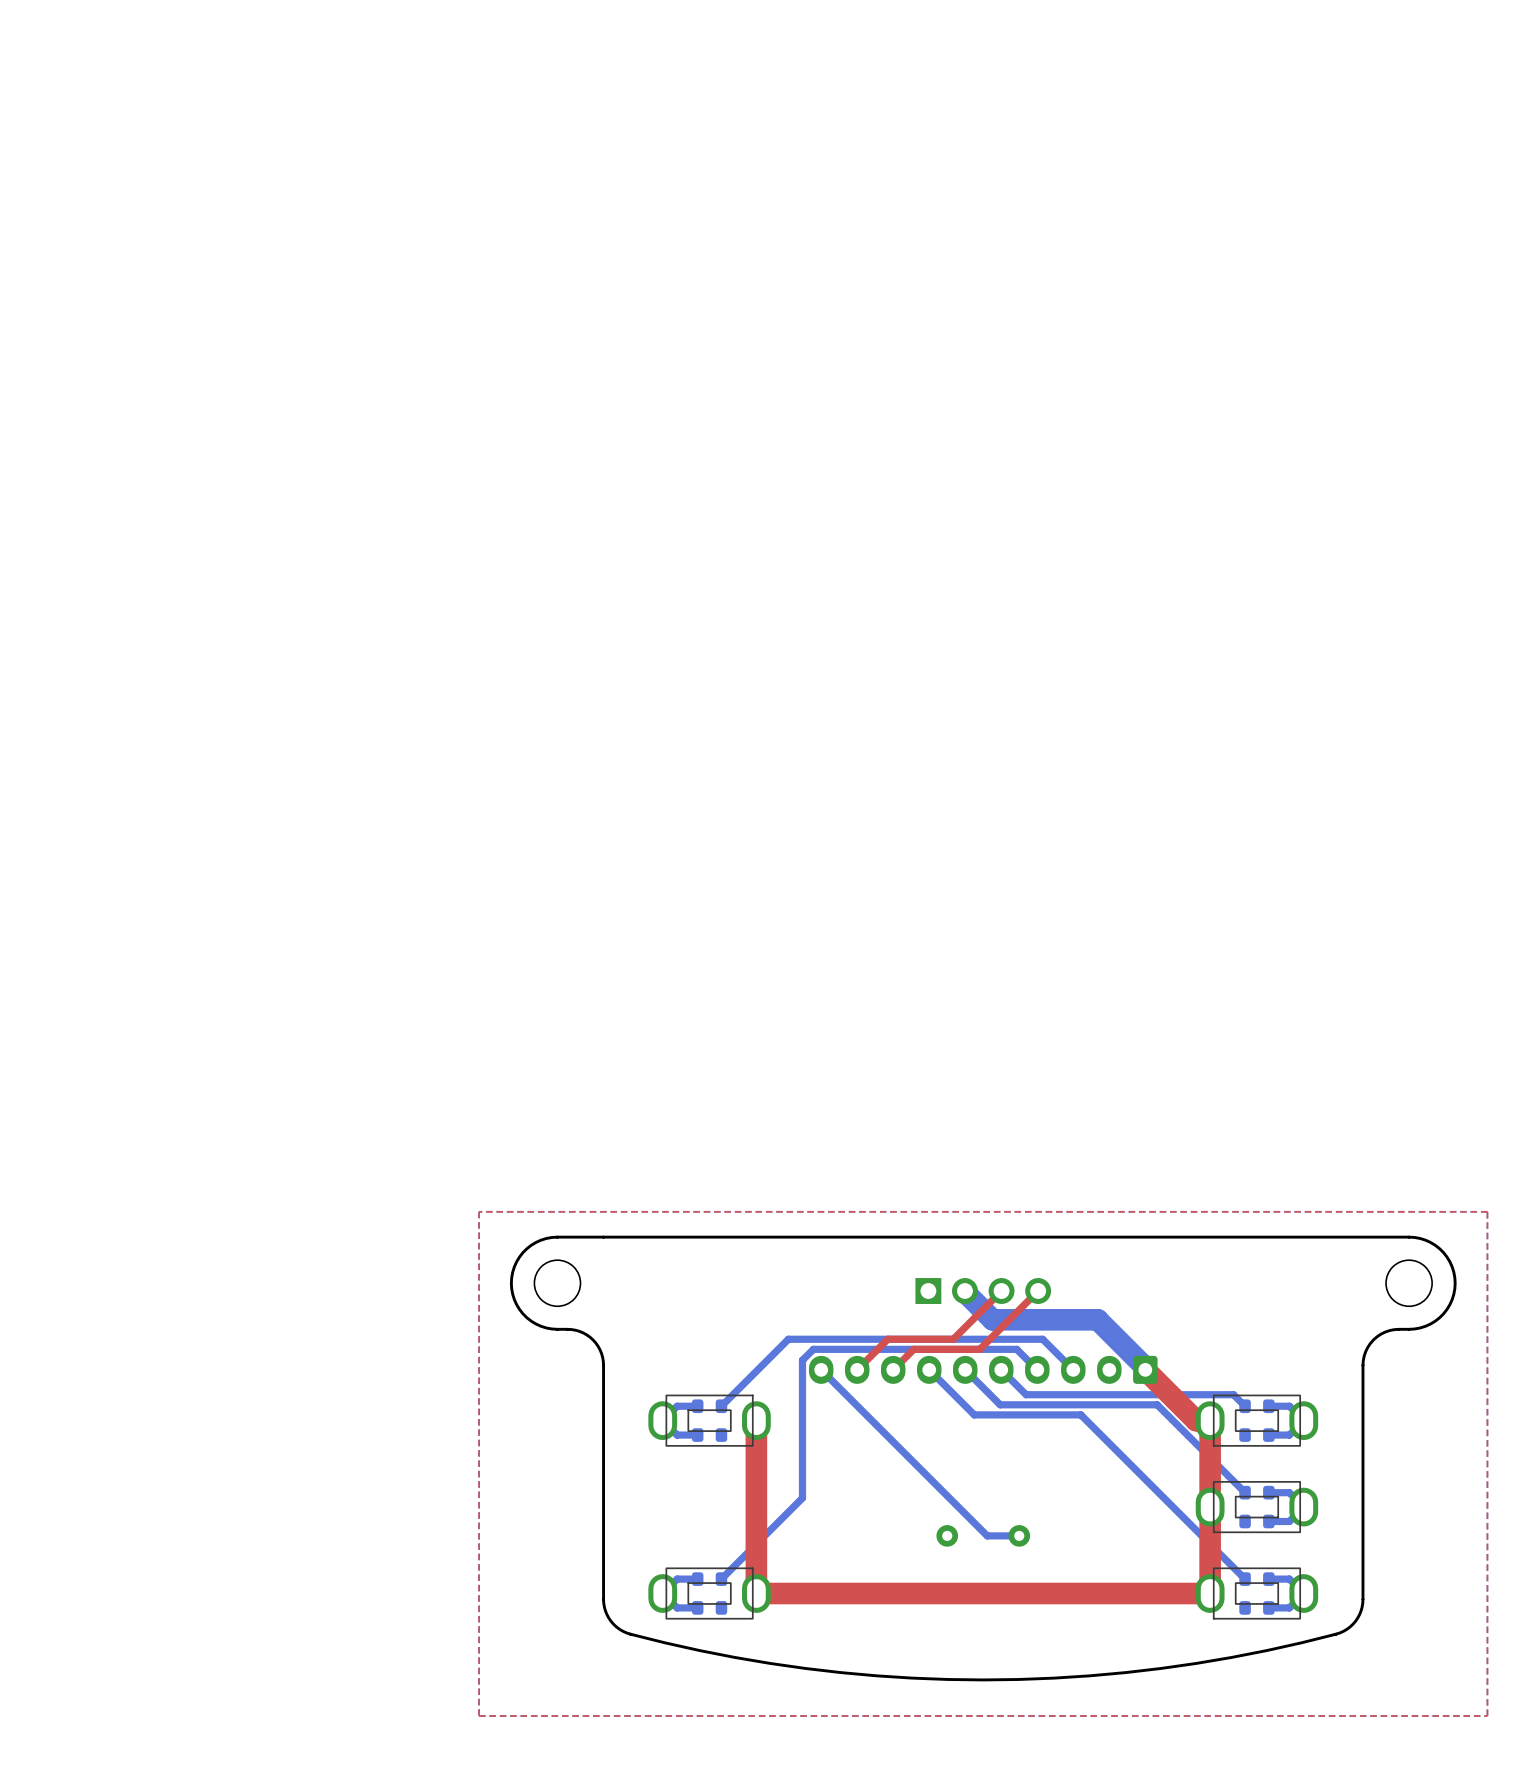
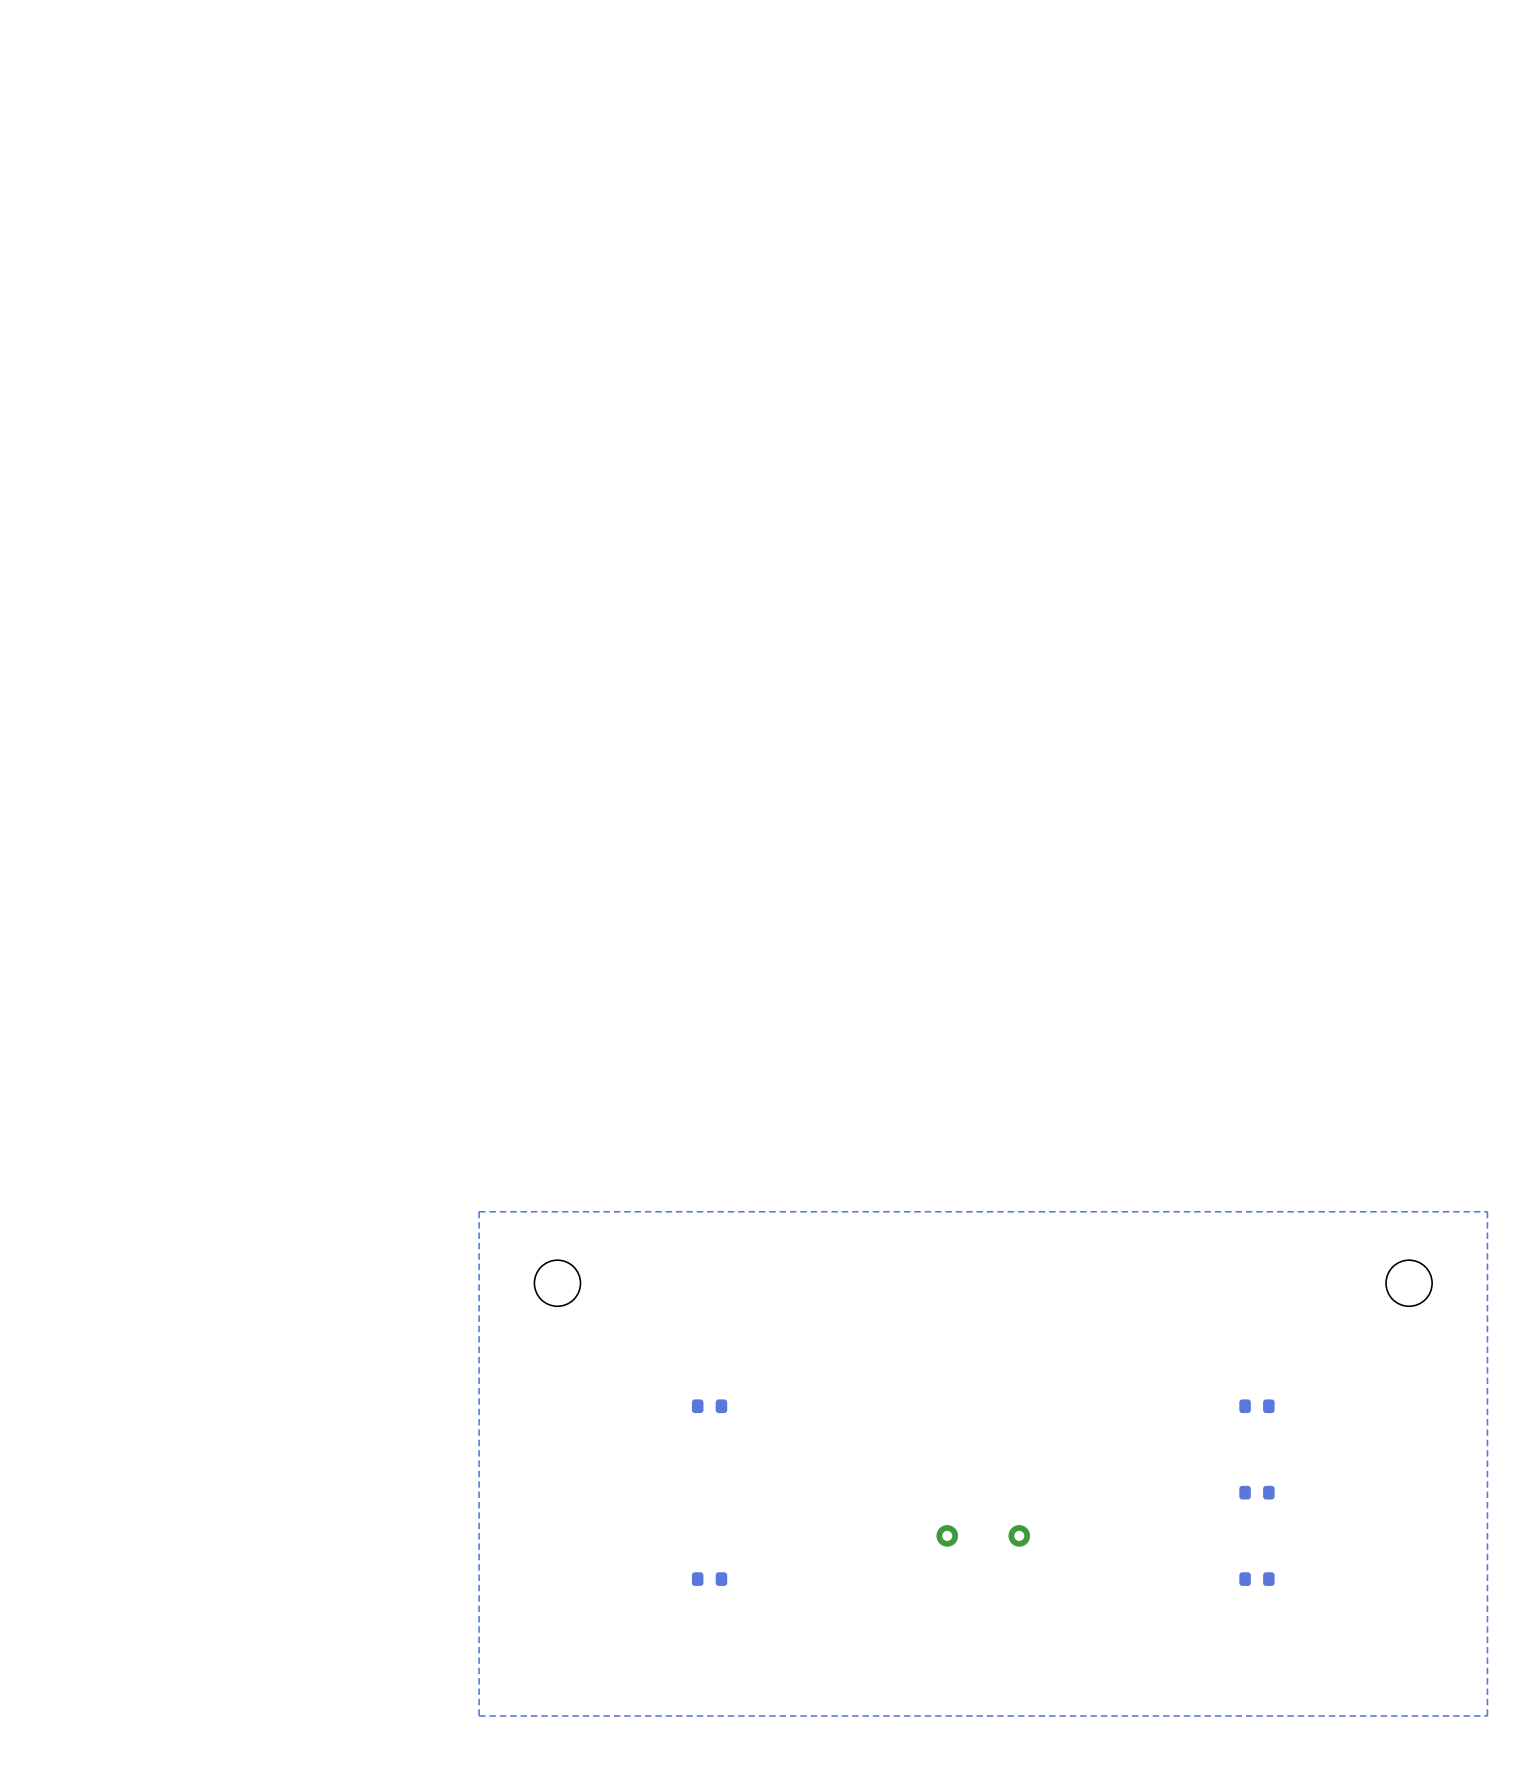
top zone outline: (479, 1211) (479, 1715) (1487, 1715) (1487, 1211) (479, 1211) -> none
board edge: (557, 1237) (1409, 1237) (1425, 1240) (1439, 1248) (1449, 1261) (1455, 1283) (1449, 1304) (1439, 1317) (1420, 1327) (1394, 1329) (1380, 1334) (1370, 1343) (1364, 1356) (1362, 1603) (1357, 1618) (1346, 1629) (1336, 1634) (1301, 1642) (1231, 1657) (1125, 1672) (1018, 1679) (911, 1678) (840, 1672) (734, 1657) (630, 1634) (619, 1629) (611, 1621) (605, 1610) (603, 1599) (603, 1365) (601, 1353) (595, 1342) (583, 1332) (571, 1329) (546, 1327) (531, 1321) (519, 1309) (511, 1288) (512, 1272) (522, 1252) (536, 1242) (557, 1237) -> none
bottom track: (964, 1291) (992, 1319) (1097, 1319) (1145, 1367) (1145, 1369) -> none
part: (983, 1291) -> none
top track: (1001, 1291) (953, 1339) (887, 1339) (857, 1369) -> none
top track: (1038, 1291) (979, 1349) (913, 1349) (893, 1369) -> none
bottom track: (821, 1369) (987, 1535) (1019, 1535) -> none
bottom track: (929, 1369) (974, 1414) (1080, 1414) (1245, 1579) -> none
bottom track: (965, 1369) (1000, 1404) (1157, 1404) (1245, 1492) -> none
part: (983, 1369) -> none
bottom track: (1001, 1369) (1026, 1394) (1233, 1394) (1245, 1406) -> none
bottom track: (1037, 1369) (1016, 1349) (813, 1349) (802, 1360) (802, 1498) (721, 1579) -> none
bottom track: (1073, 1369) (1042, 1339) (788, 1339) (721, 1406) -> none
top track: (1145, 1369) (1196, 1420) (1210, 1420) (1210, 1593) (756, 1593) (756, 1420) -> none
bottom track: (697, 1406) (677, 1406) (662, 1420) (677, 1435) (697, 1435) -> none
bottom track: (1268, 1406) (1289, 1406) (1303, 1420) (1289, 1435) (1268, 1435) -> none
part: (709, 1420) -> none
part: (1256, 1420) -> none
part: (709, 1435) -> none
part: (1256, 1435) -> none
bottom track: (1268, 1492) (1289, 1492) (1303, 1507) (1289, 1521) (1268, 1521) -> none
part: (1256, 1507) -> none
part: (1256, 1521) -> none
bottom track: (697, 1579) (677, 1579) (662, 1593) (677, 1607) (697, 1607) -> none
bottom track: (1268, 1579) (1289, 1579) (1303, 1593) (1289, 1607) (1268, 1607) -> none
part: (709, 1593) -> none
part: (1256, 1593) -> none
part: (709, 1607) -> none
part: (1256, 1607) -> none

